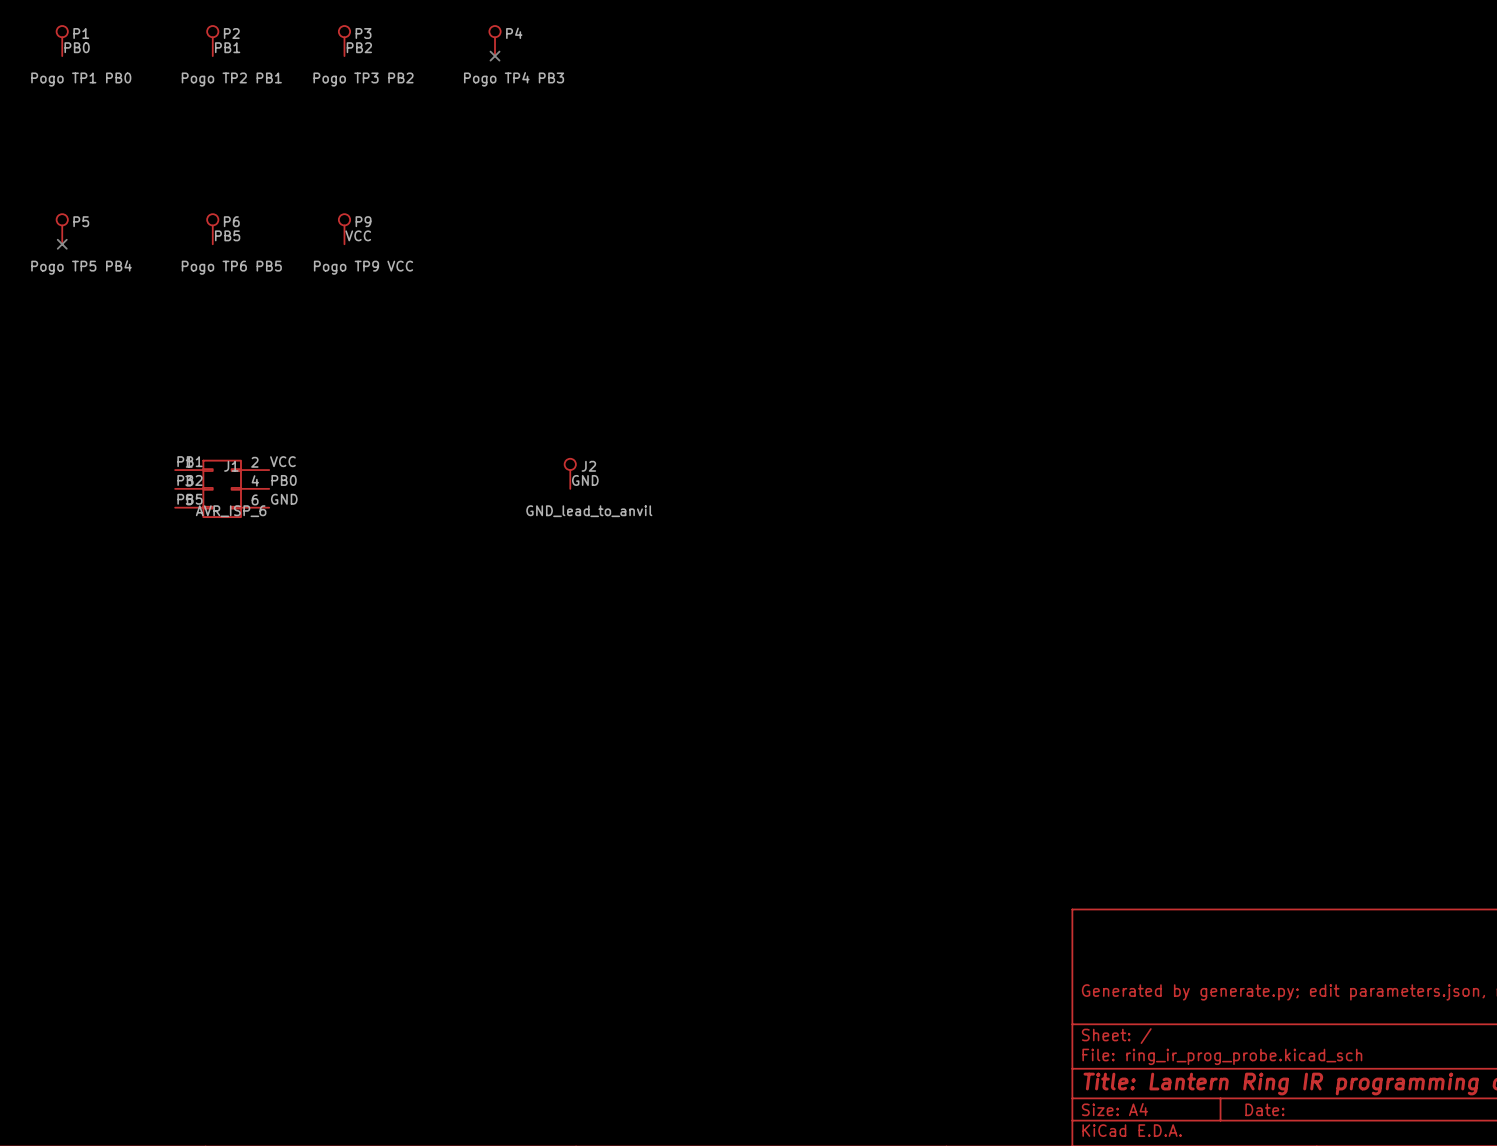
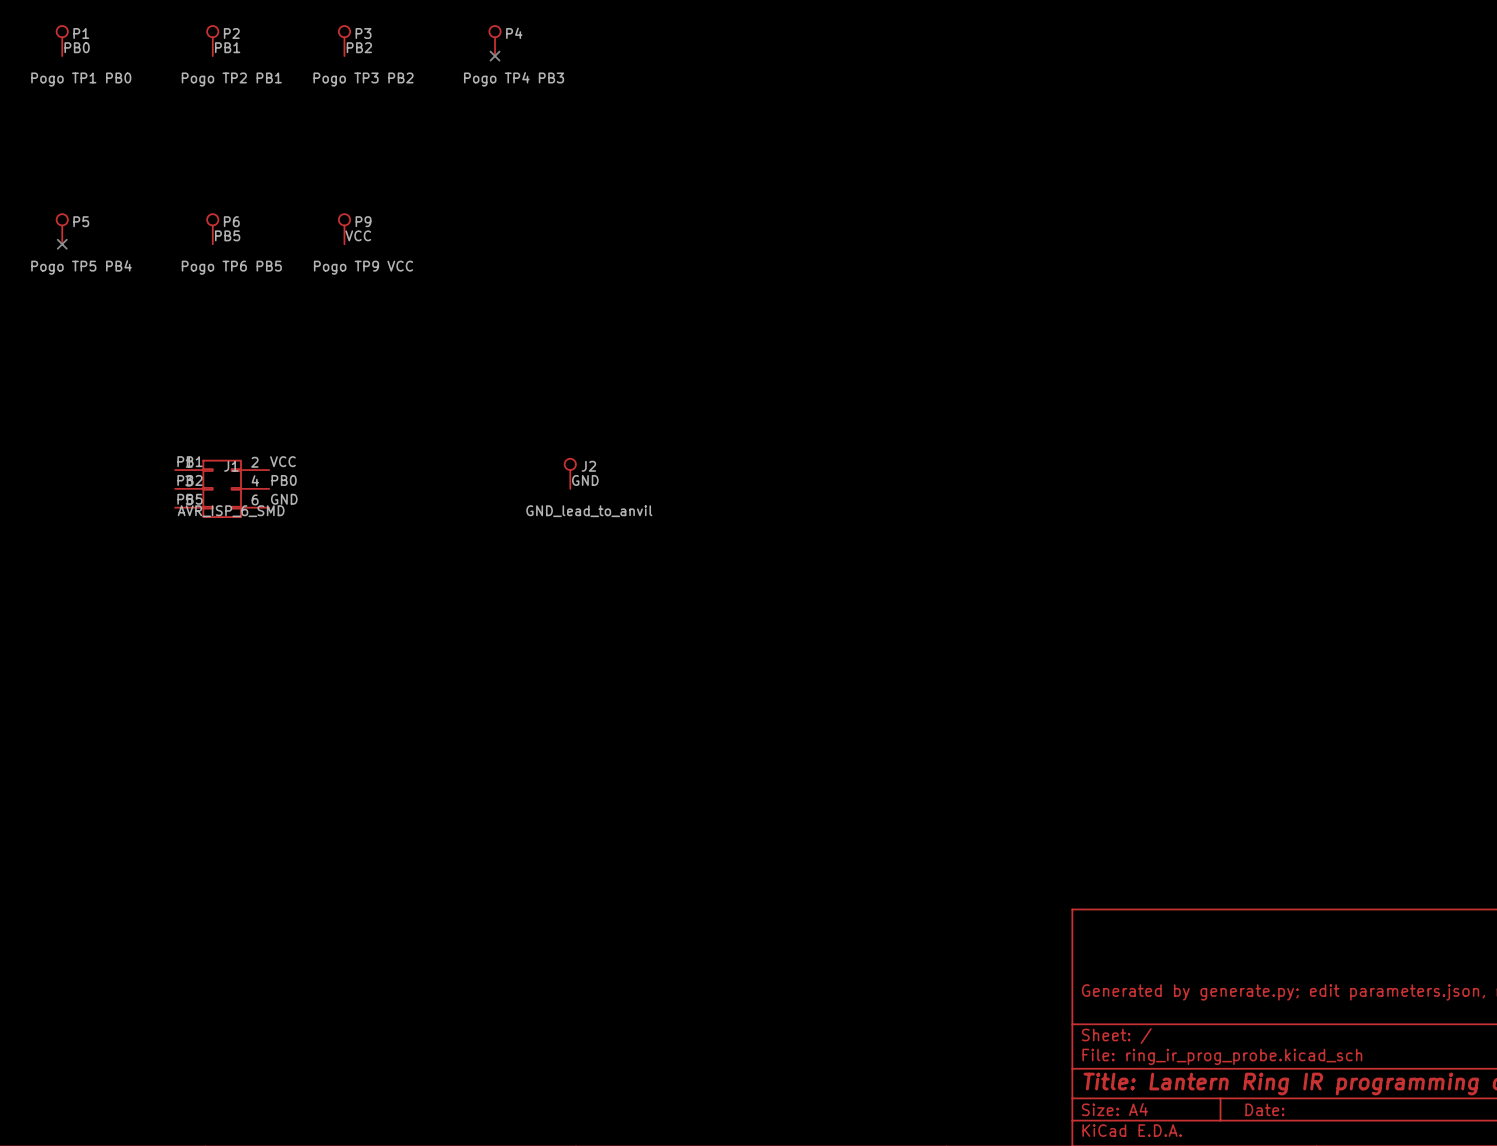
J1 value: AVR_ISP_6 (231, 511) -> AVR_ISP_6_SMD (231, 511)

